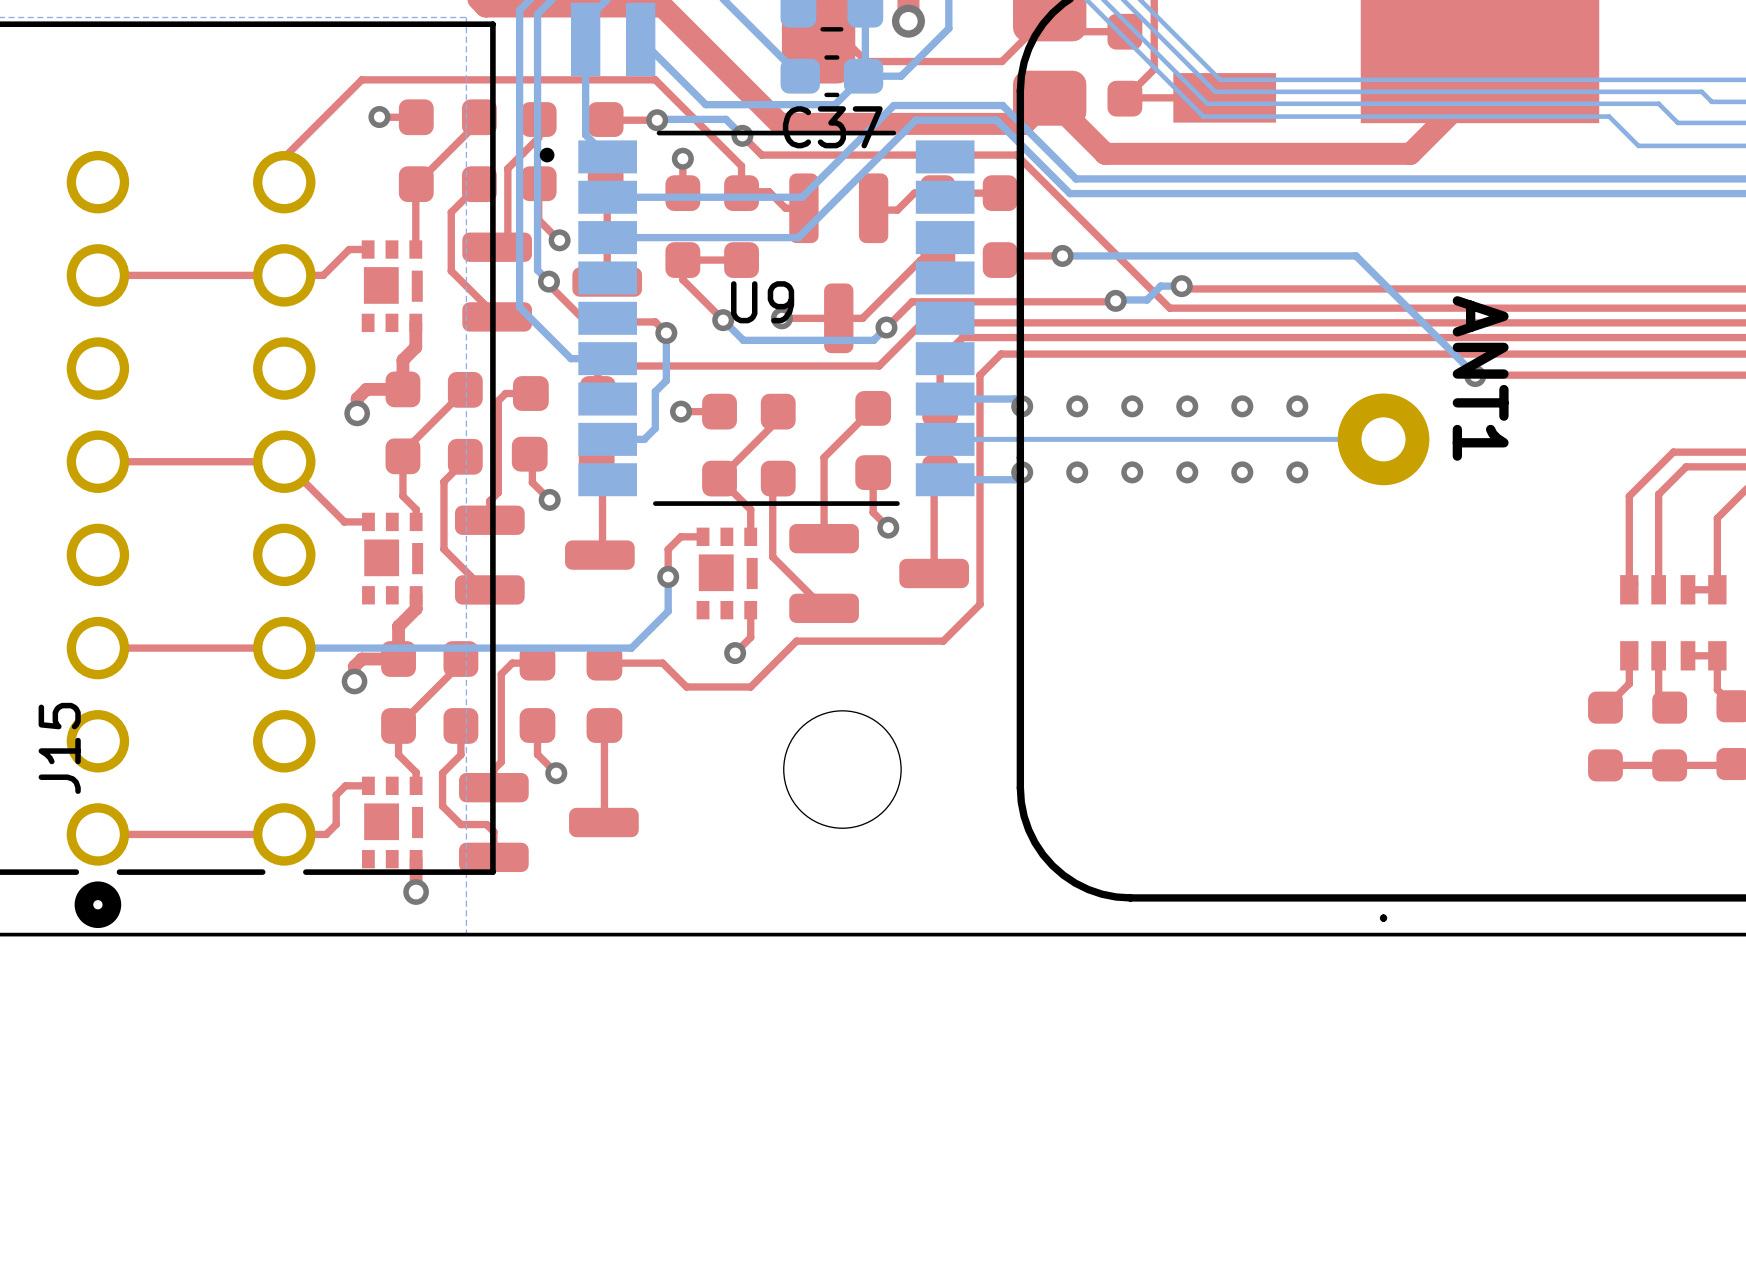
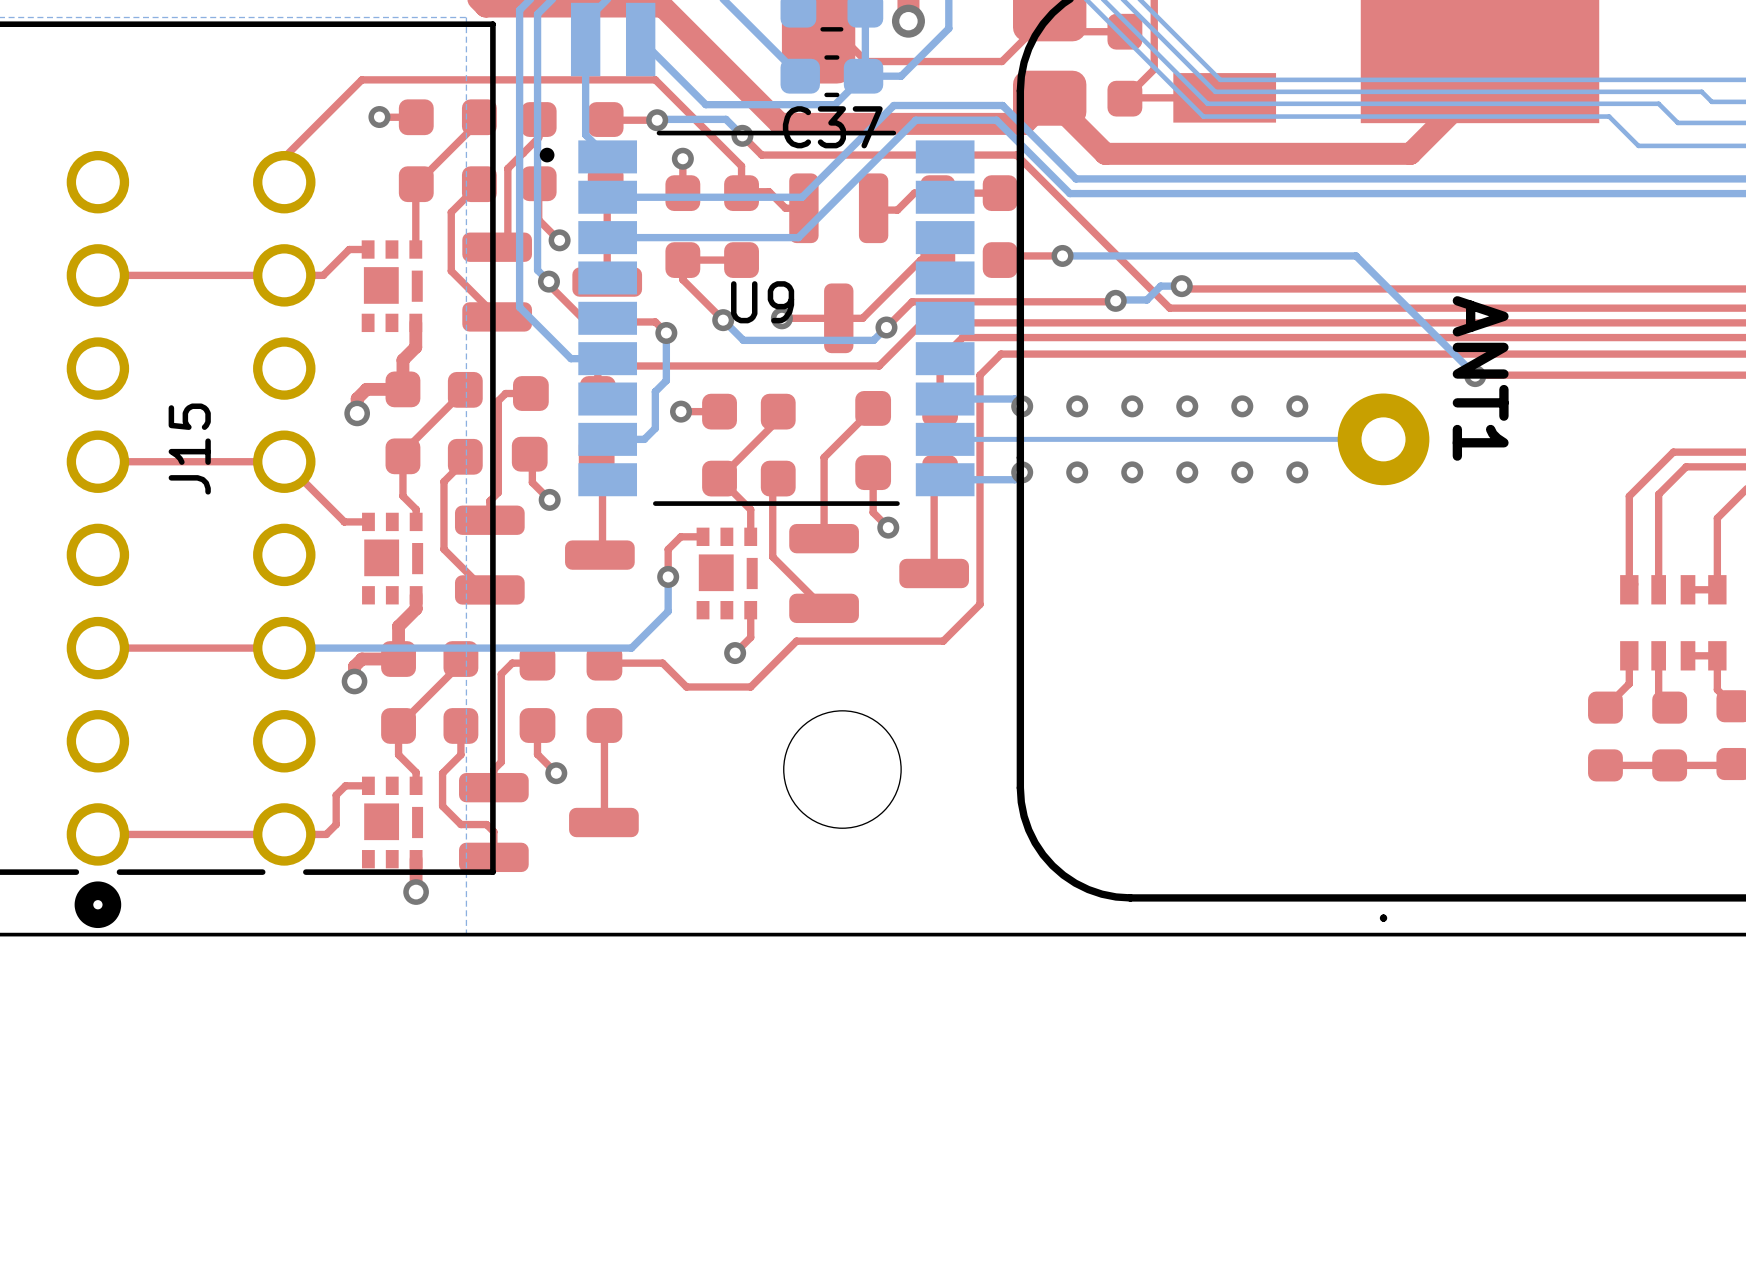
J15 name position: J15 (59, 748) -> J15 (189, 449)

